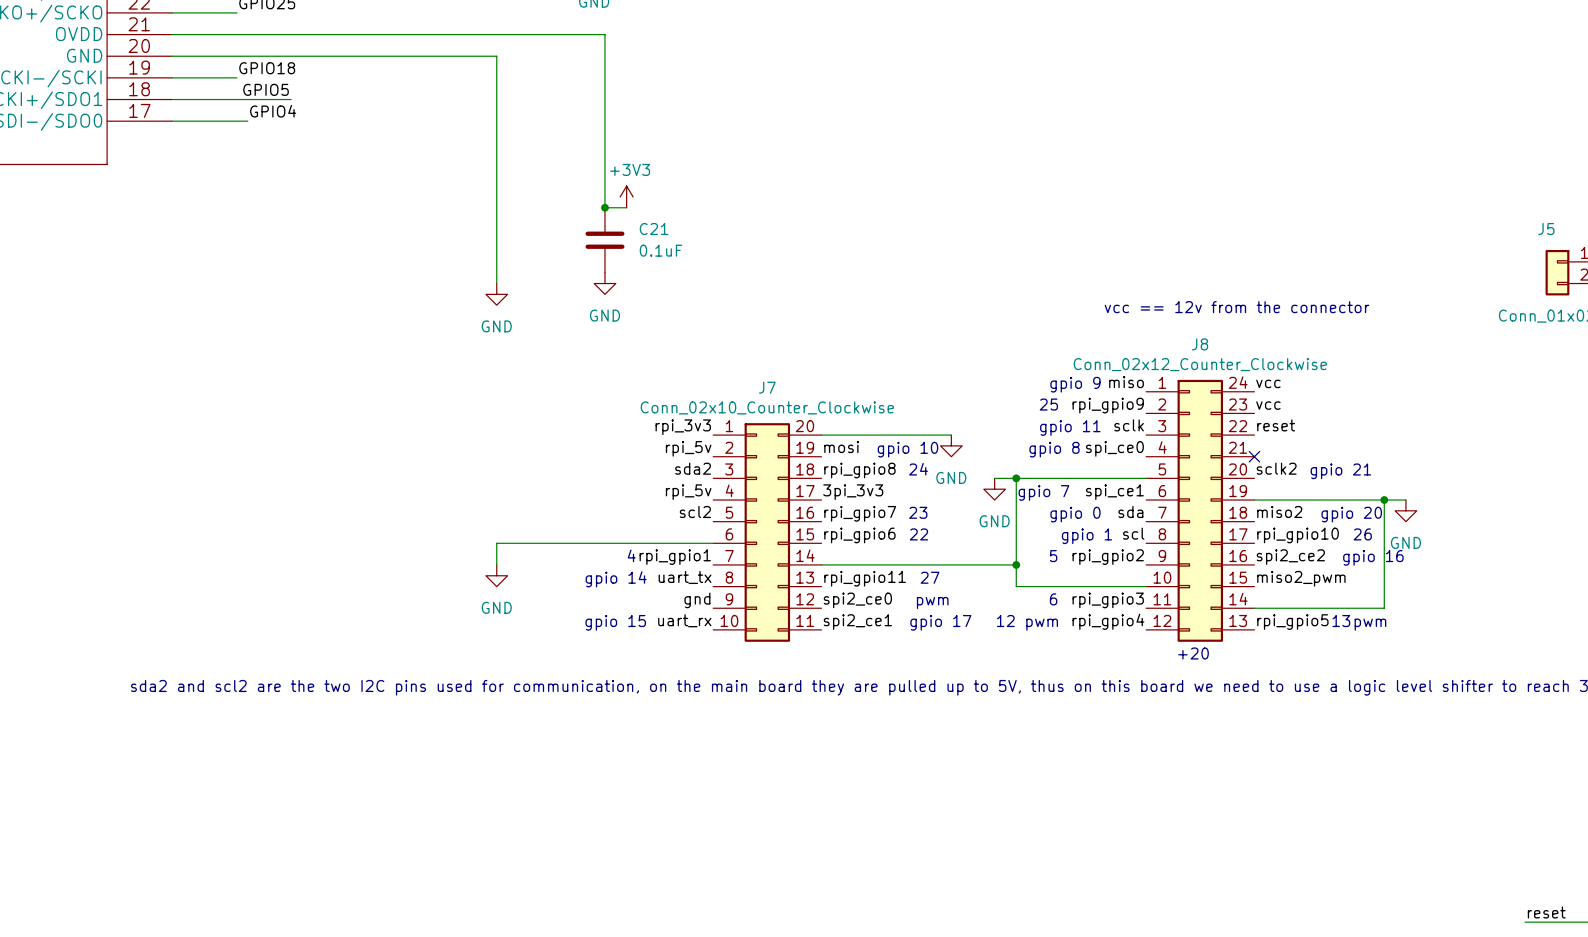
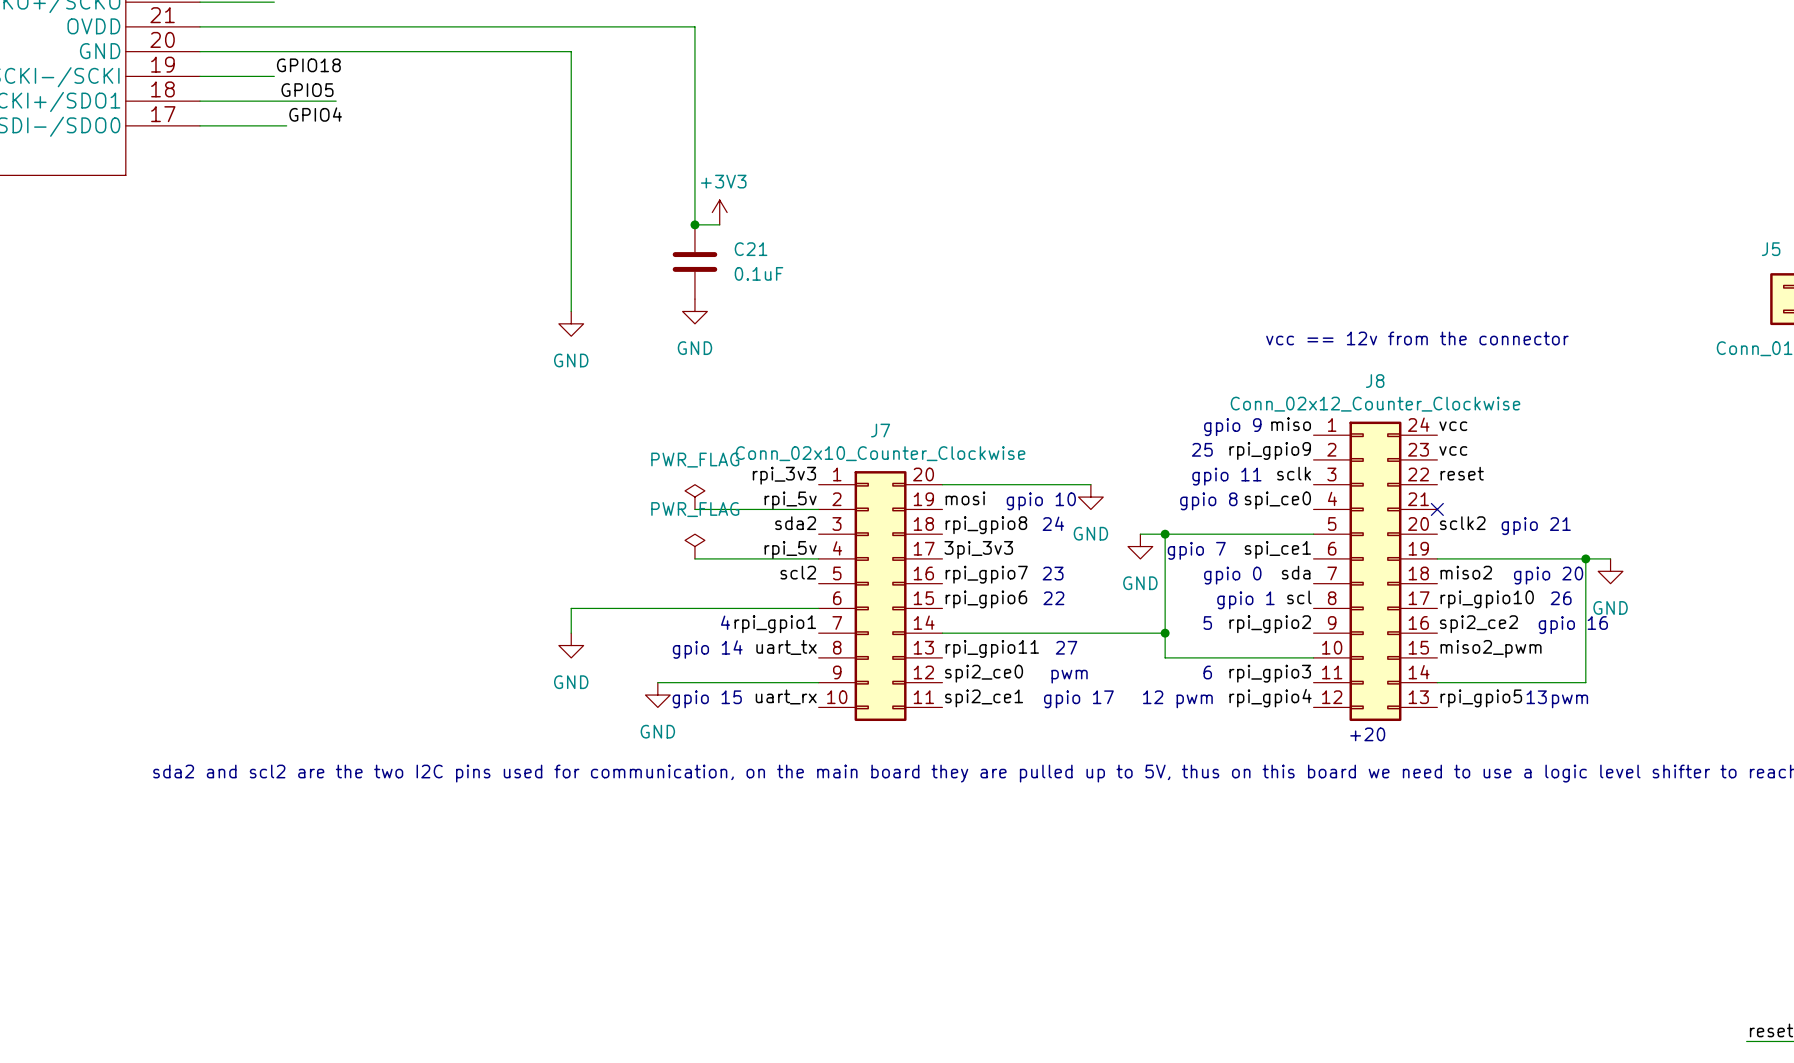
power symbol: none -> PWR_FLAG (694, 497)
wire: none -> (694, 509) (818, 509)
power symbol: none -> PWR_FLAG (694, 546)
wire: none -> (694, 558) (818, 558)
label: gnd (697, 600) -> none
wire: none -> (657, 682) (818, 682)
power symbol: none -> GND (657, 695)

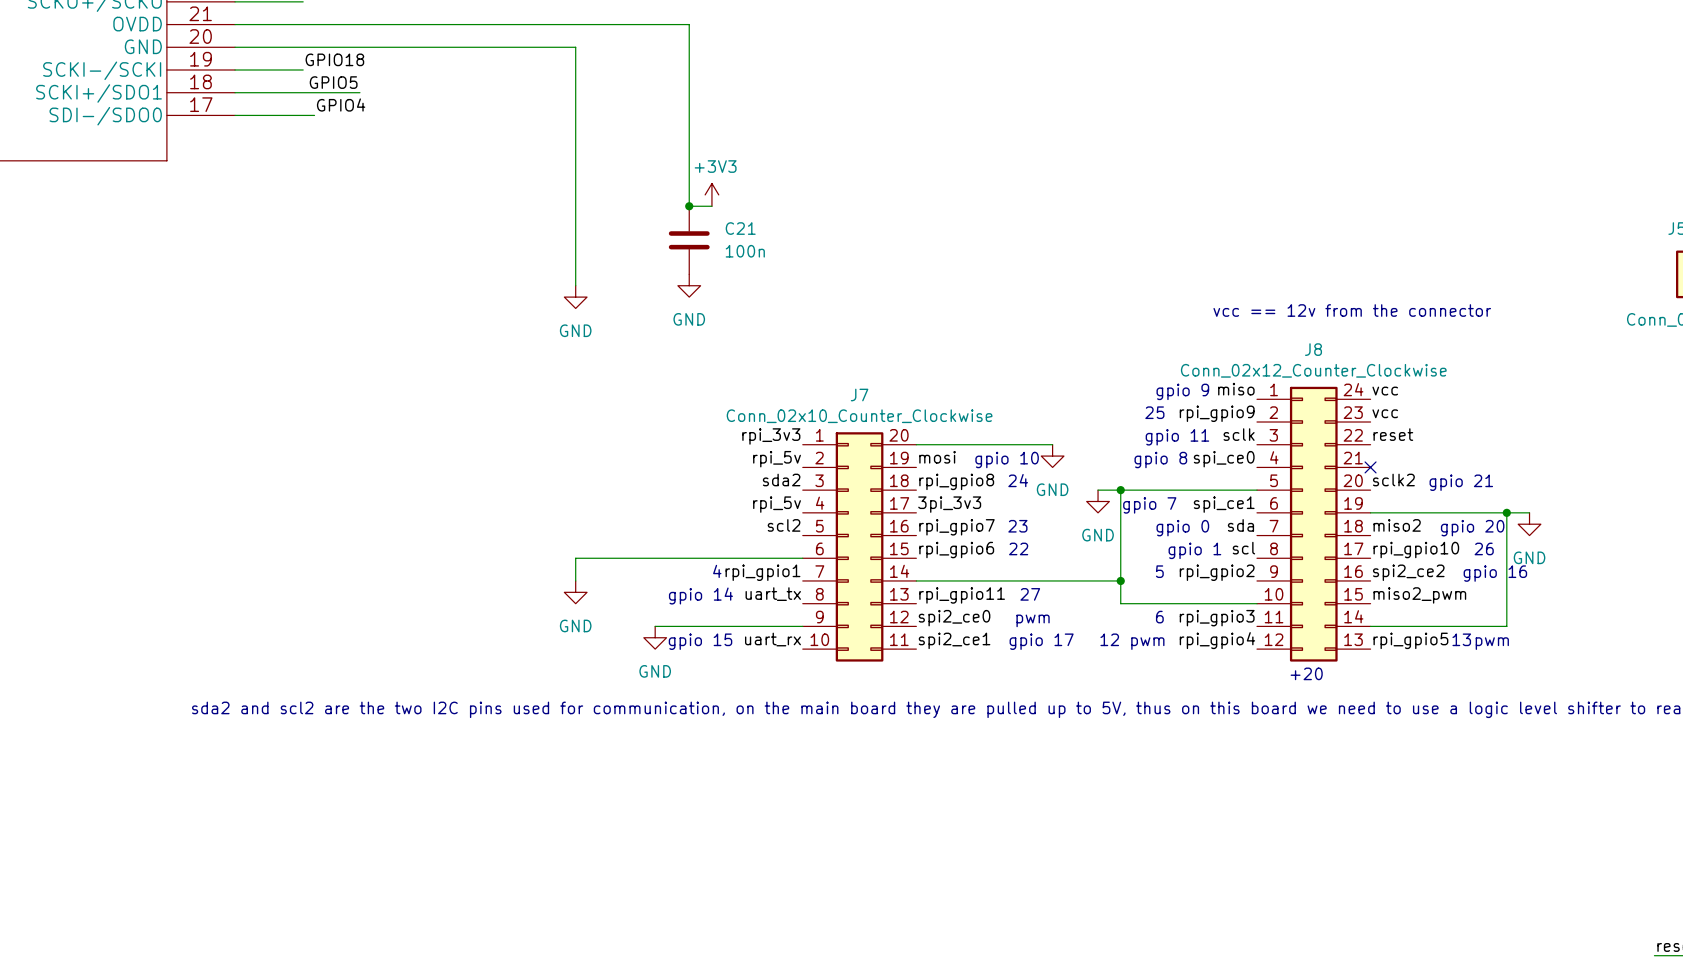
C21 value: 0.1uF (758, 273) -> 100n (745, 251)
power symbol: PWR_FLAG (694, 497) -> none
wire: (694, 509) (818, 509) -> none
power symbol: PWR_FLAG (694, 546) -> none
wire: (694, 558) (818, 558) -> none

